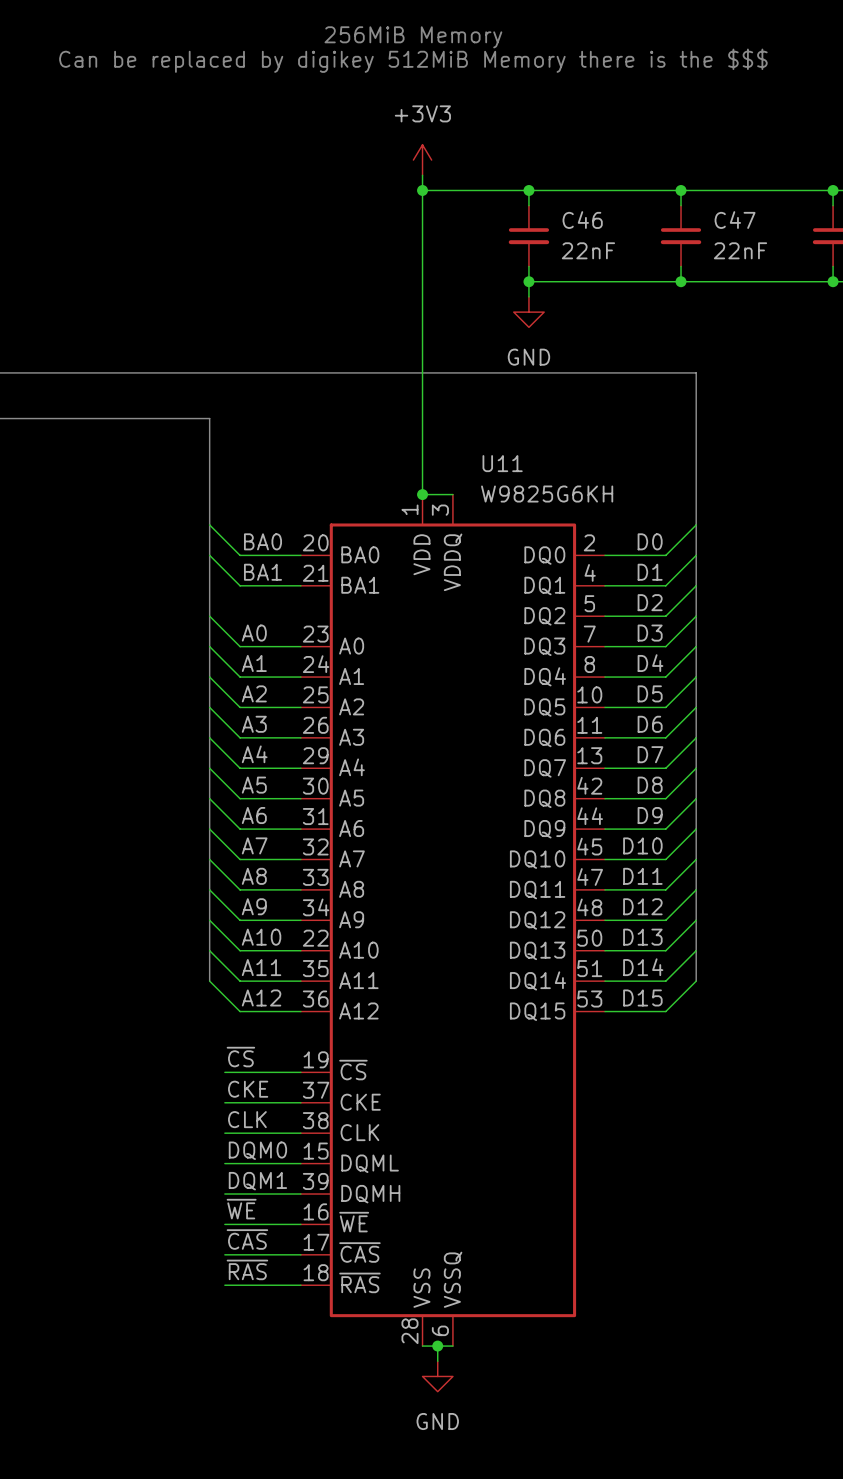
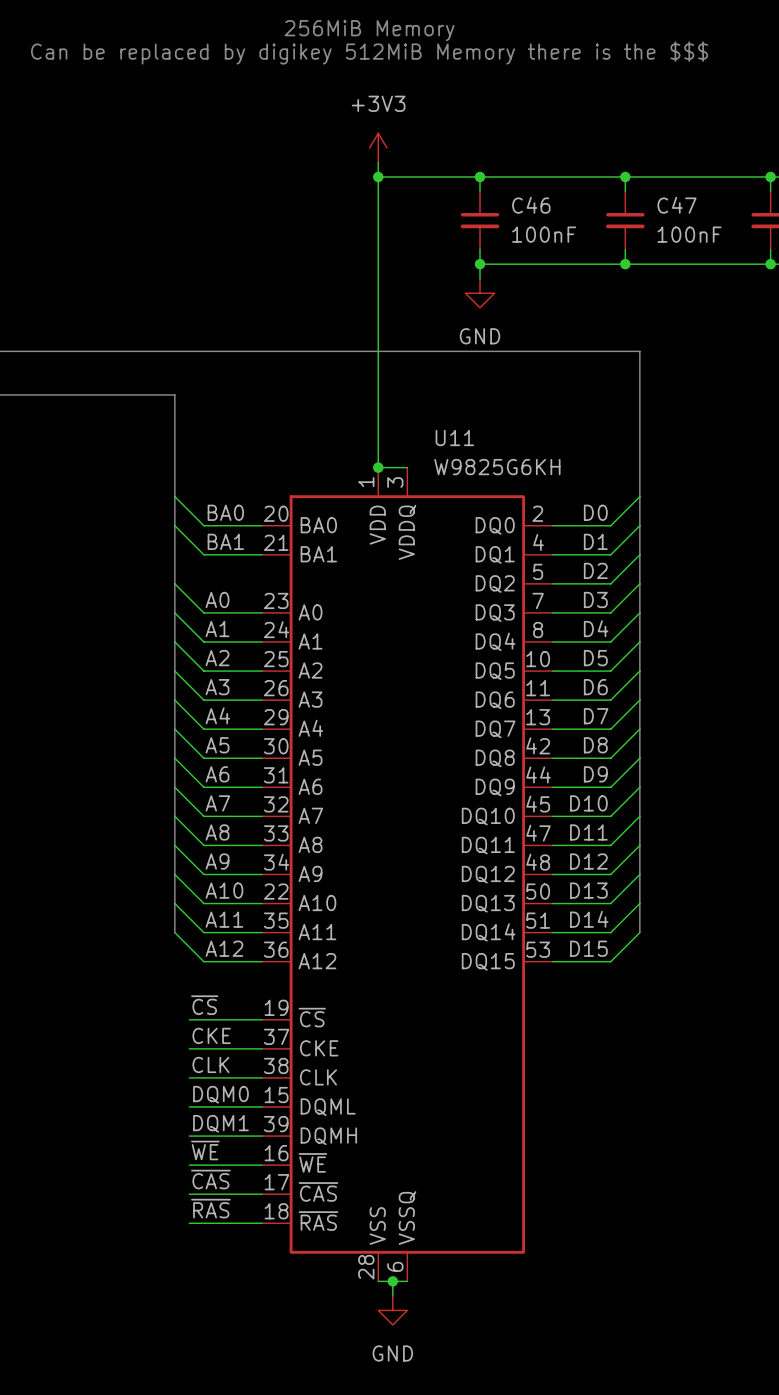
C46 value: 22nF (588, 250) -> 100nF (544, 234)
C47 value: 22nF (740, 250) -> 100nF (689, 234)

